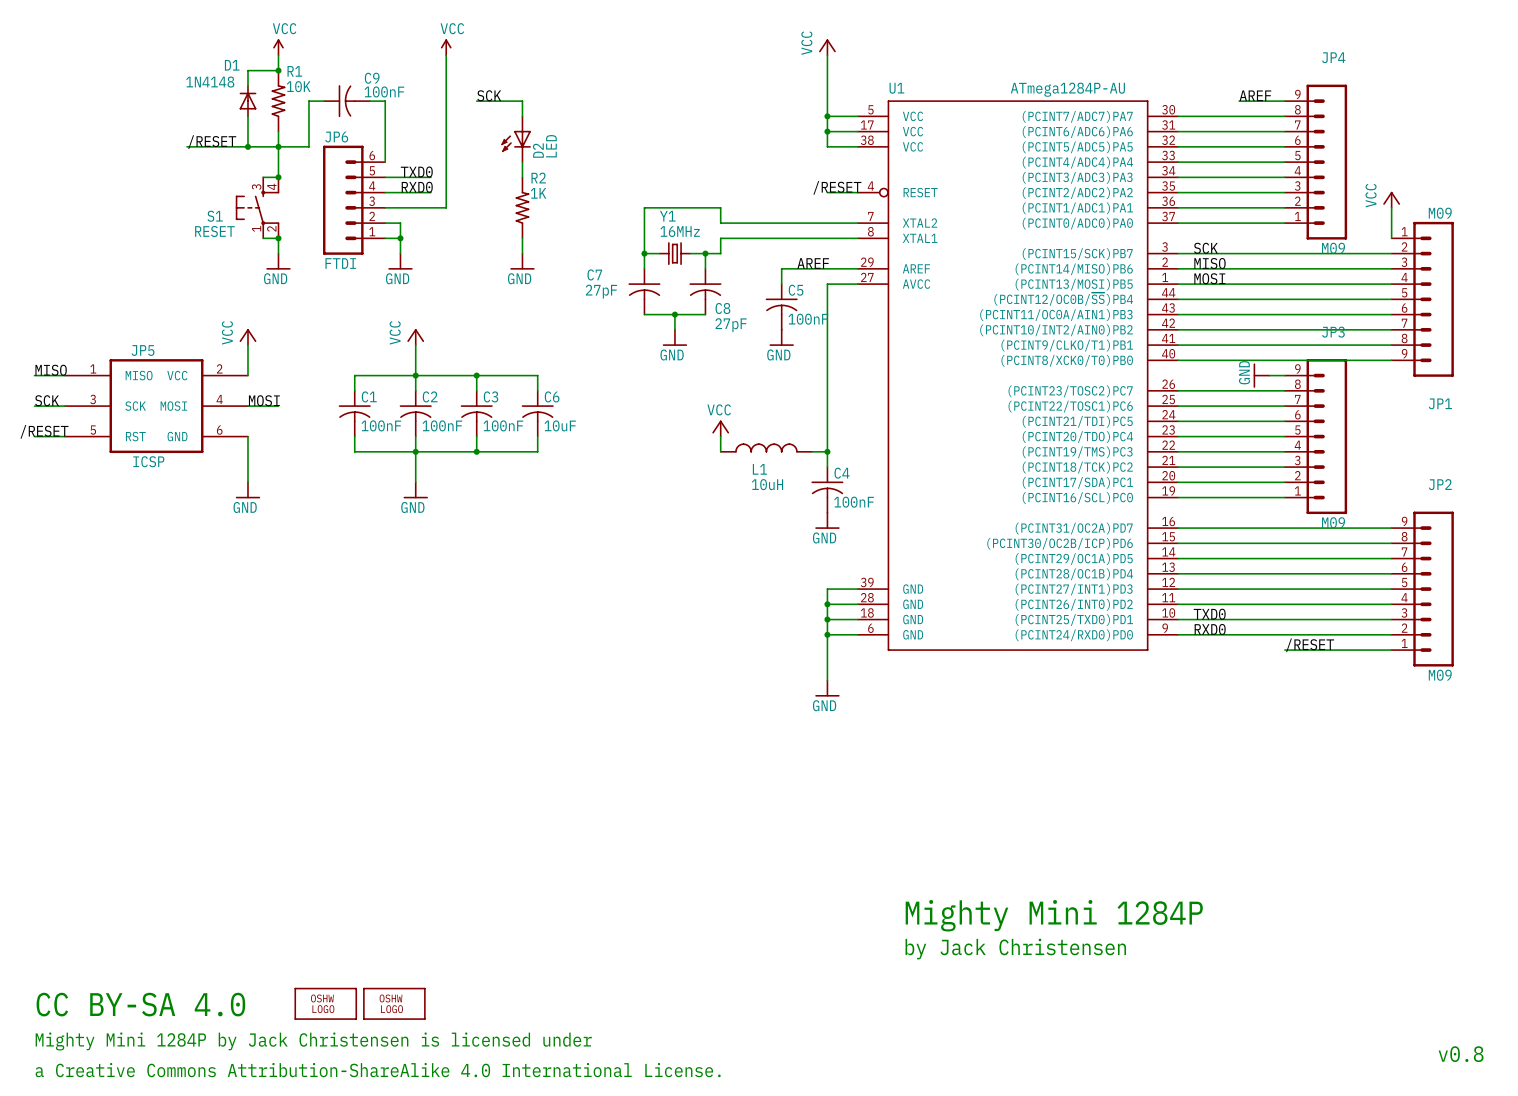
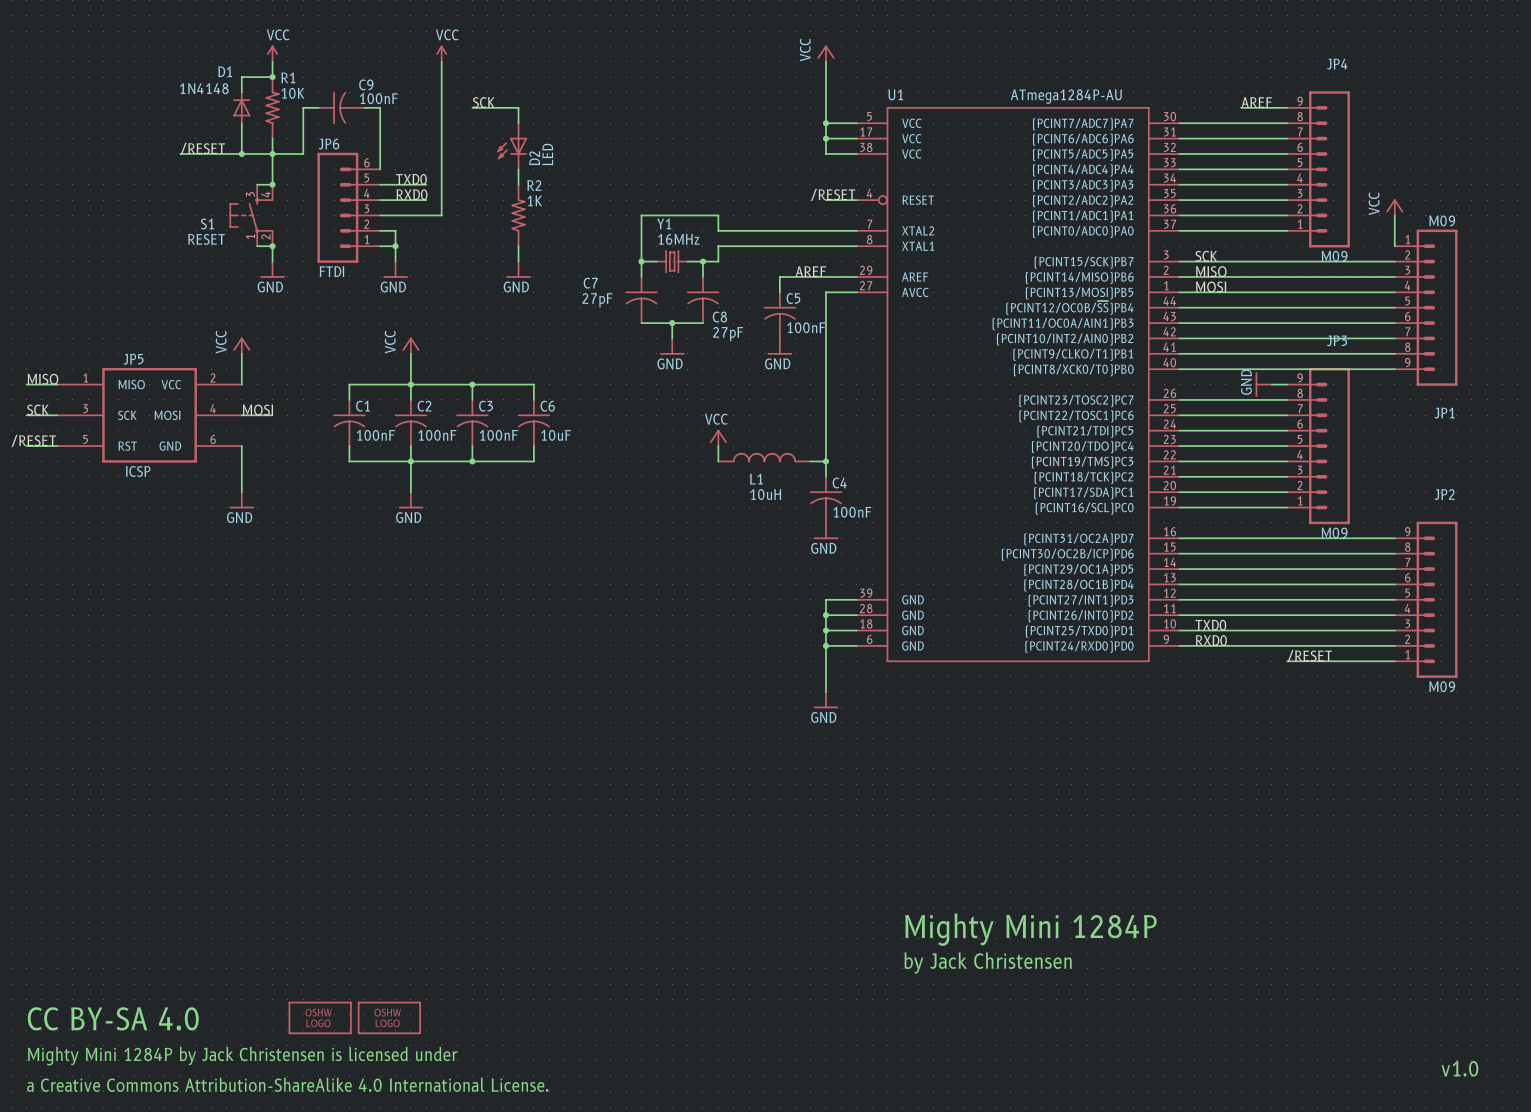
text: v0.8 (1461, 1054) -> v1.0 (1459, 1068)

